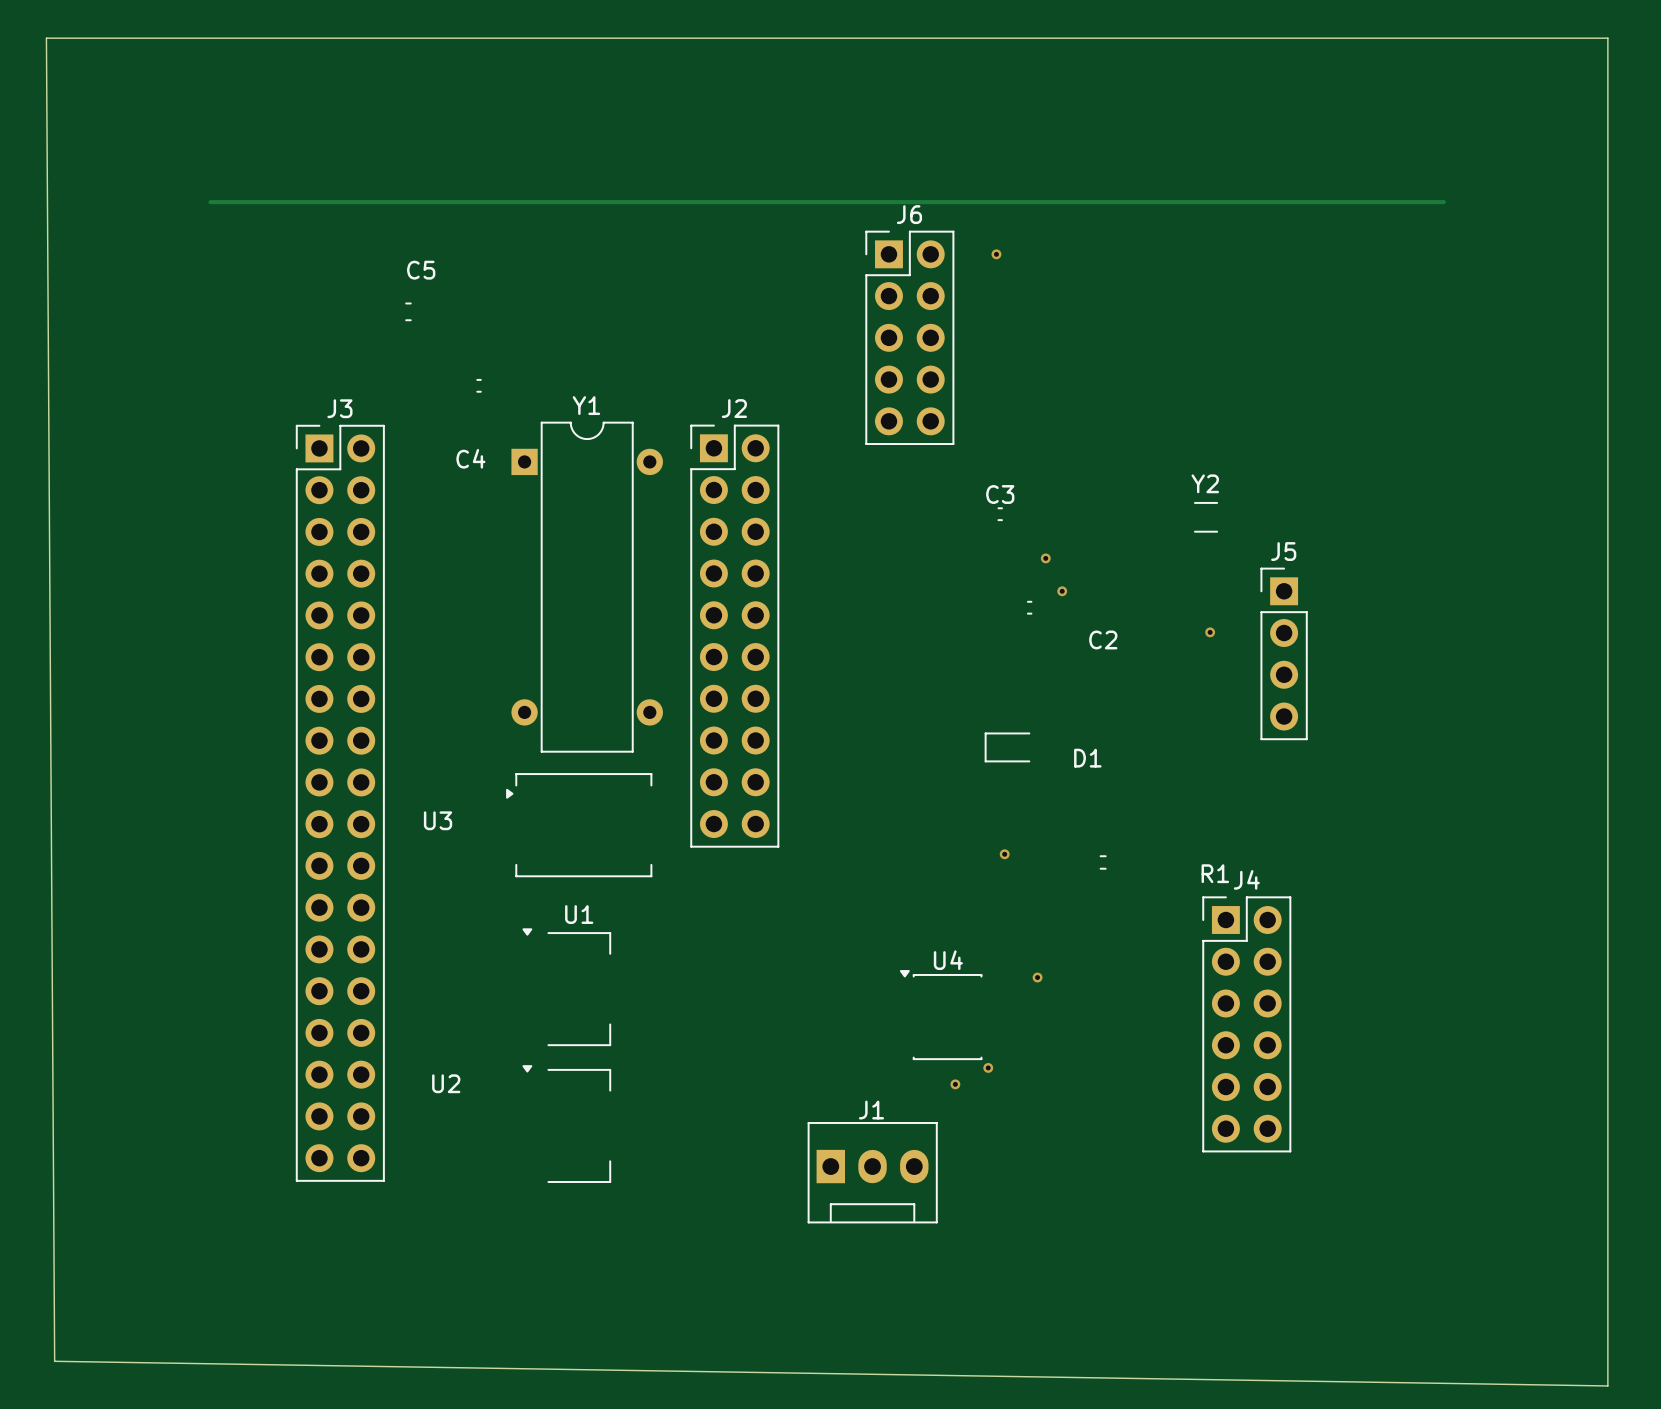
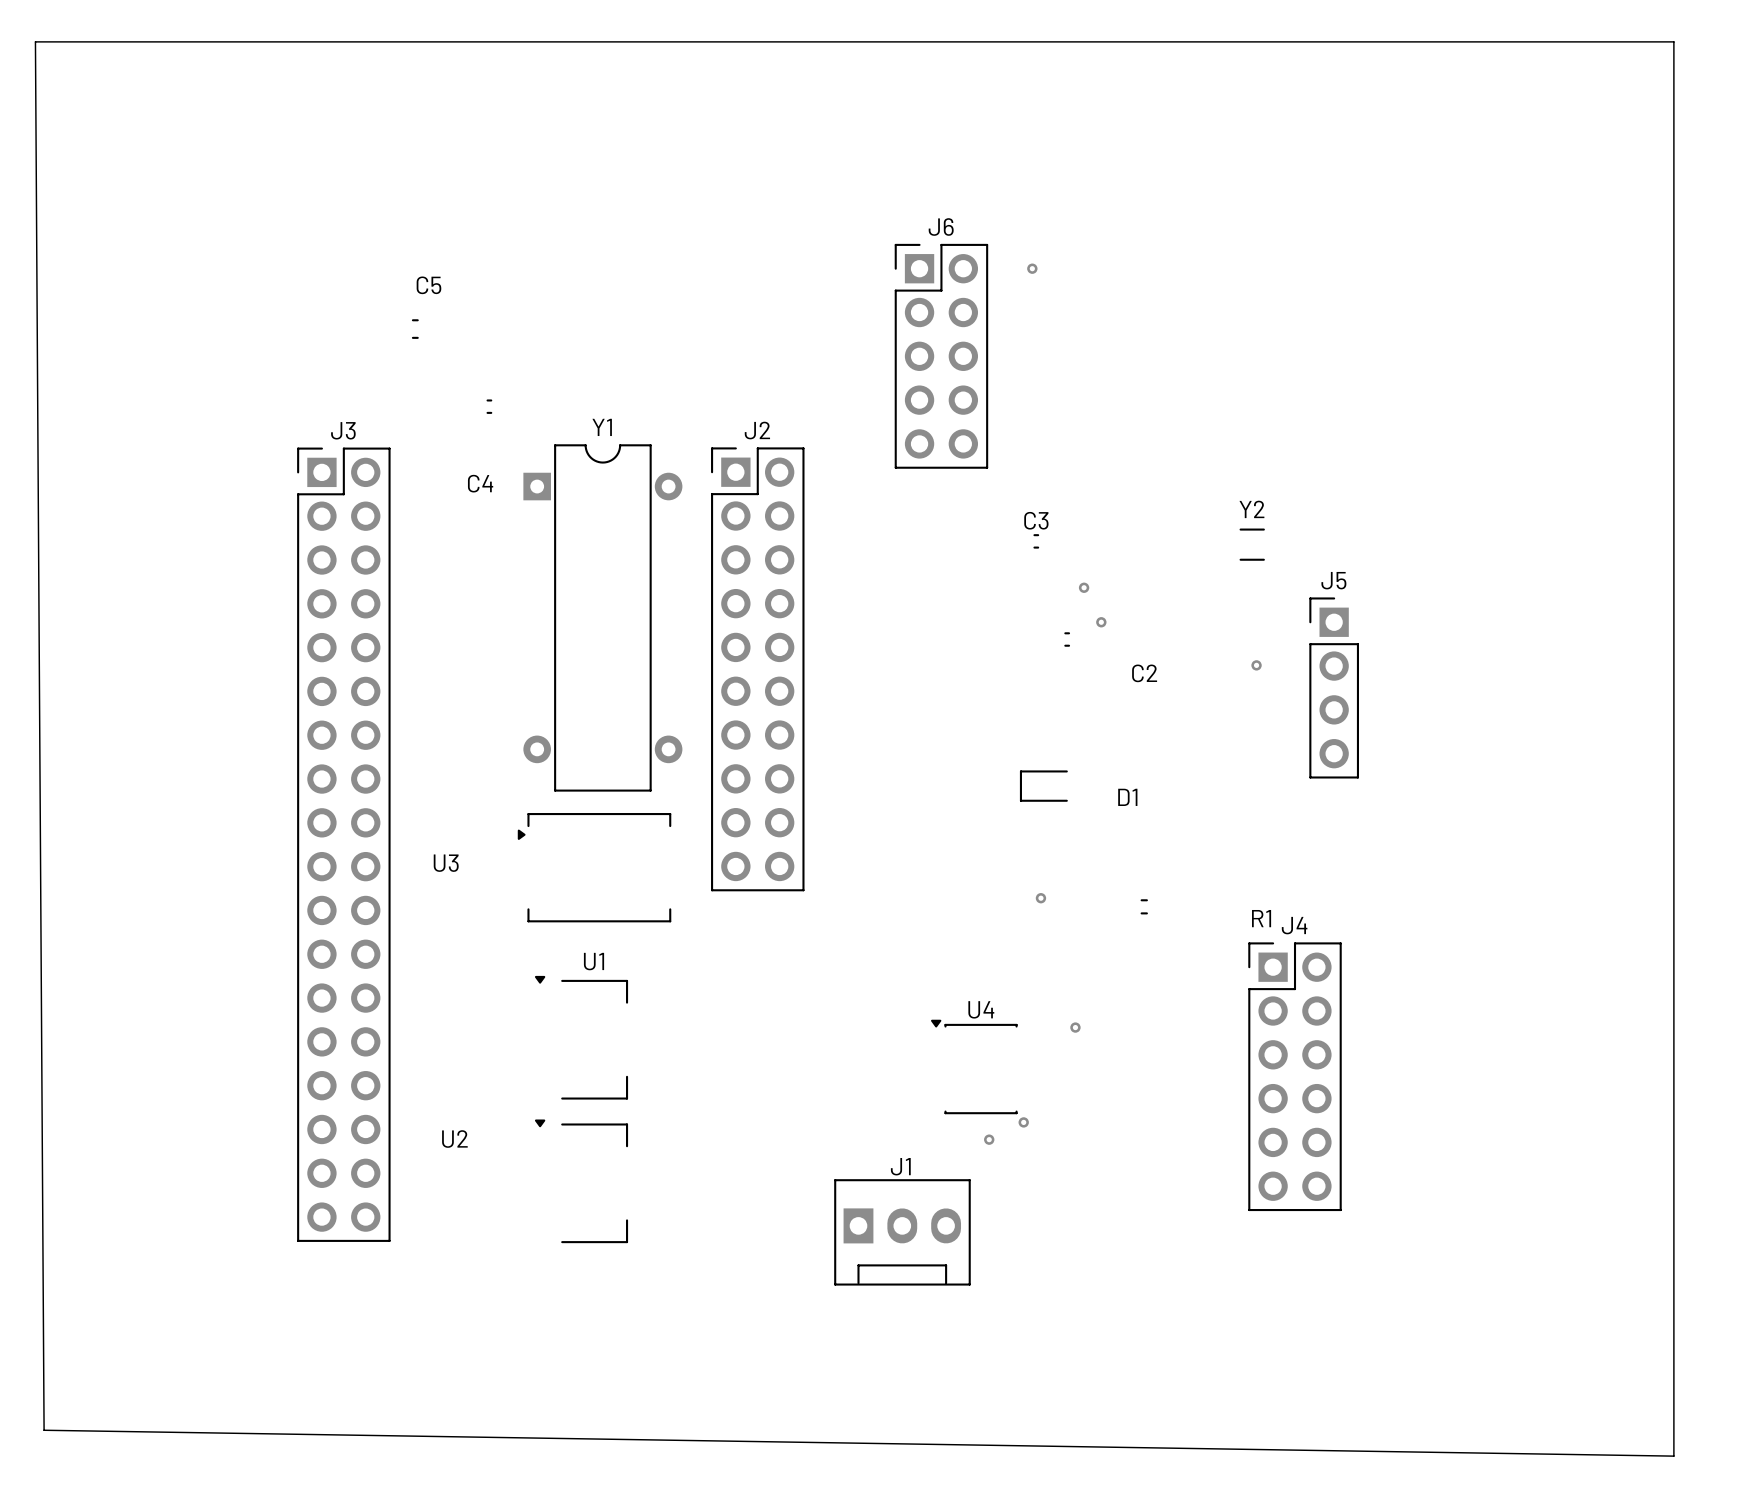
track: (210, 202) (1443, 202) -> none

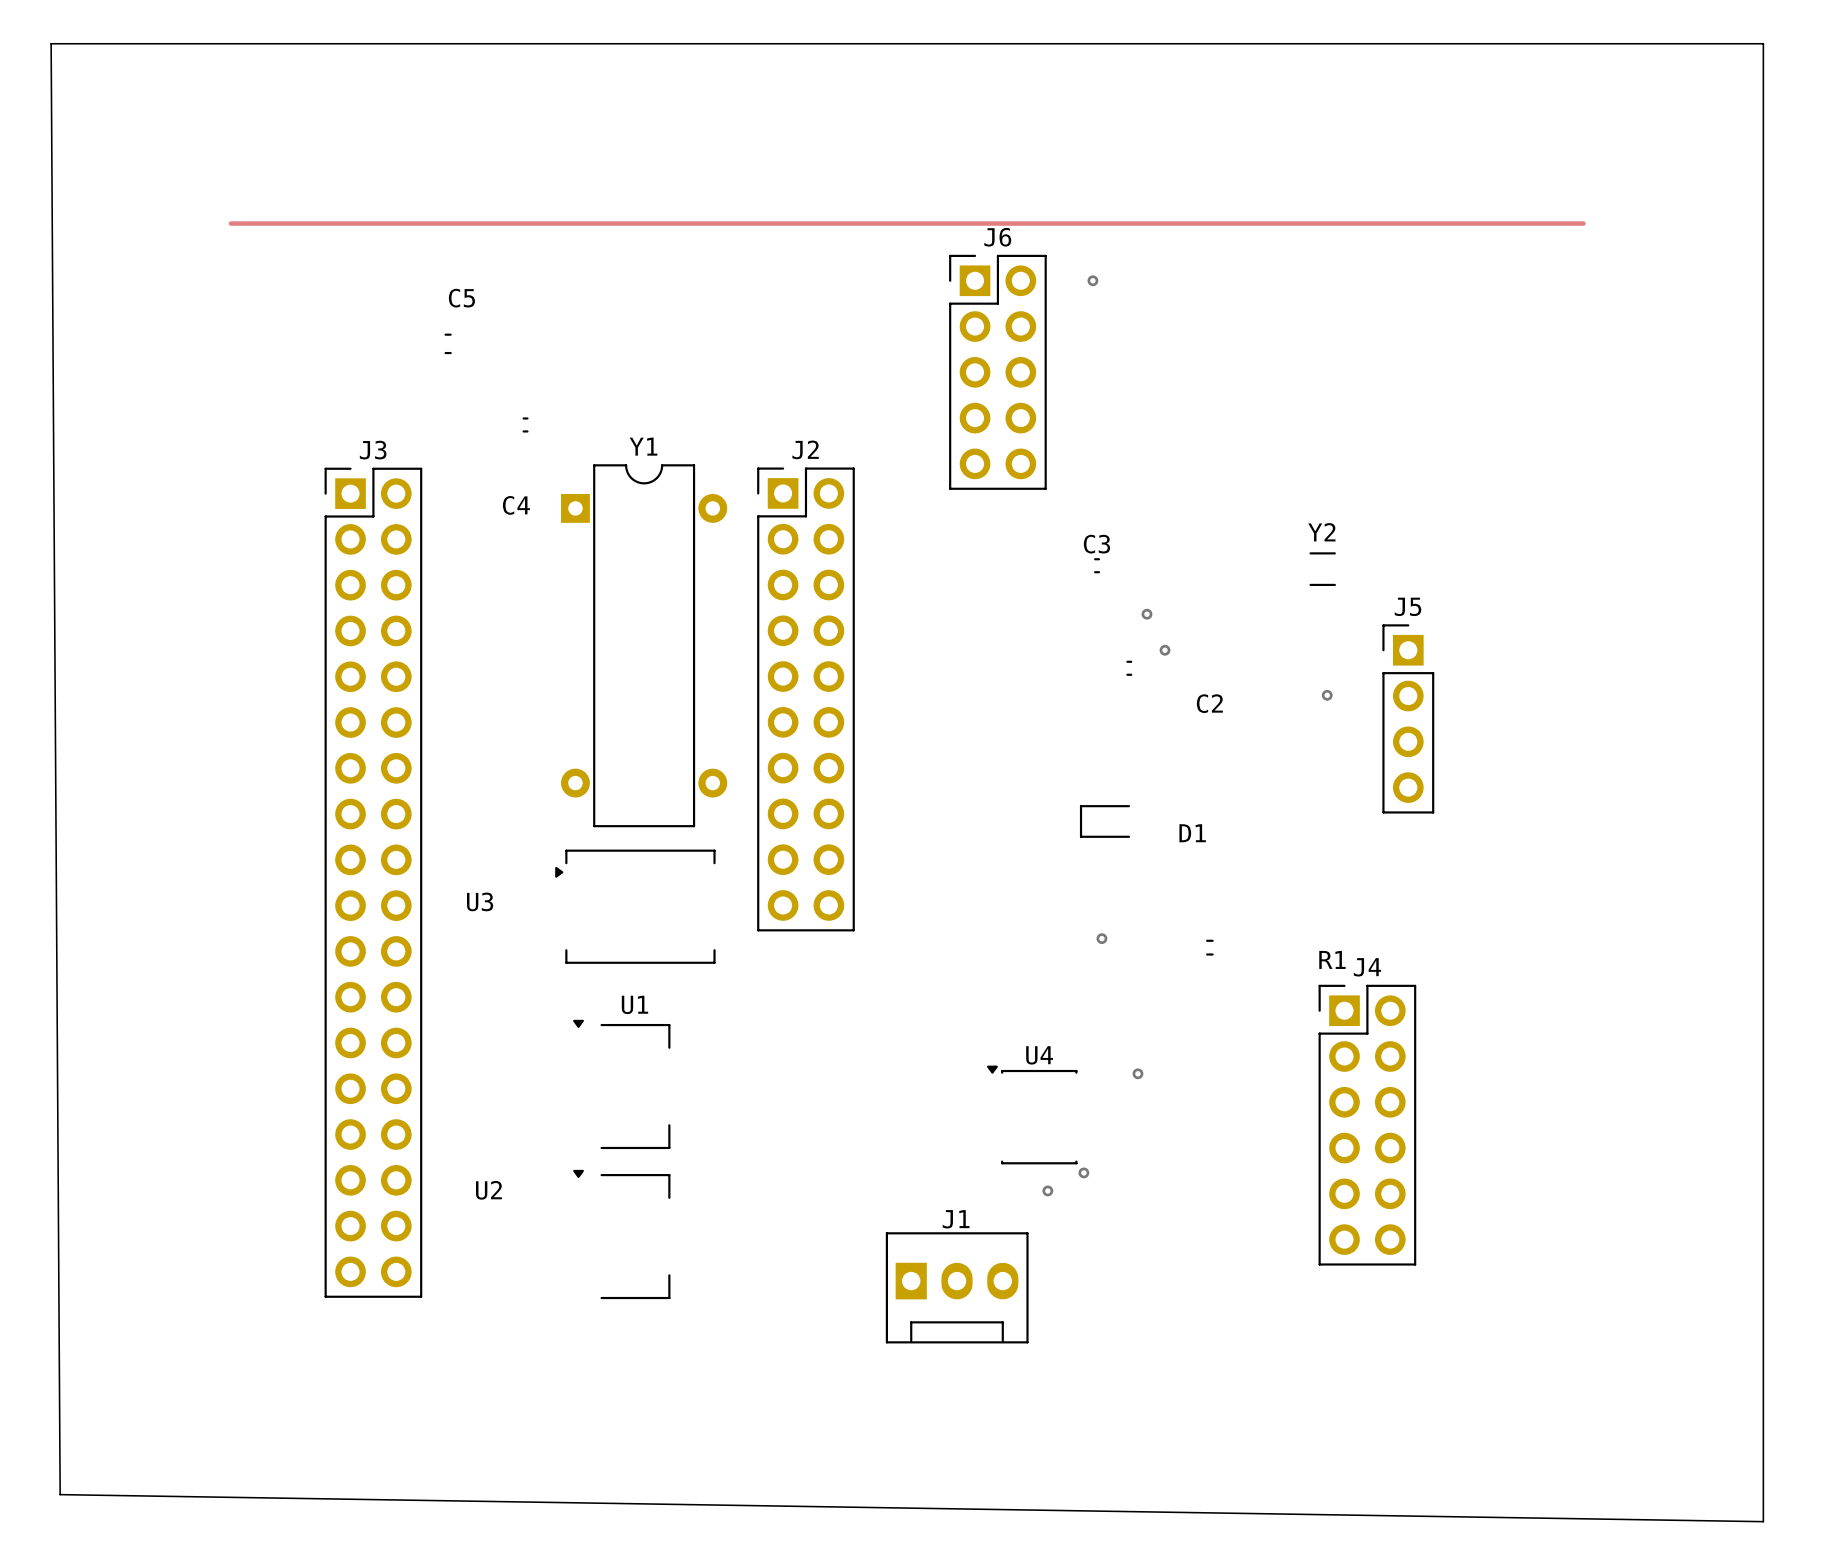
track: none -> (230, 223) (1583, 223)

